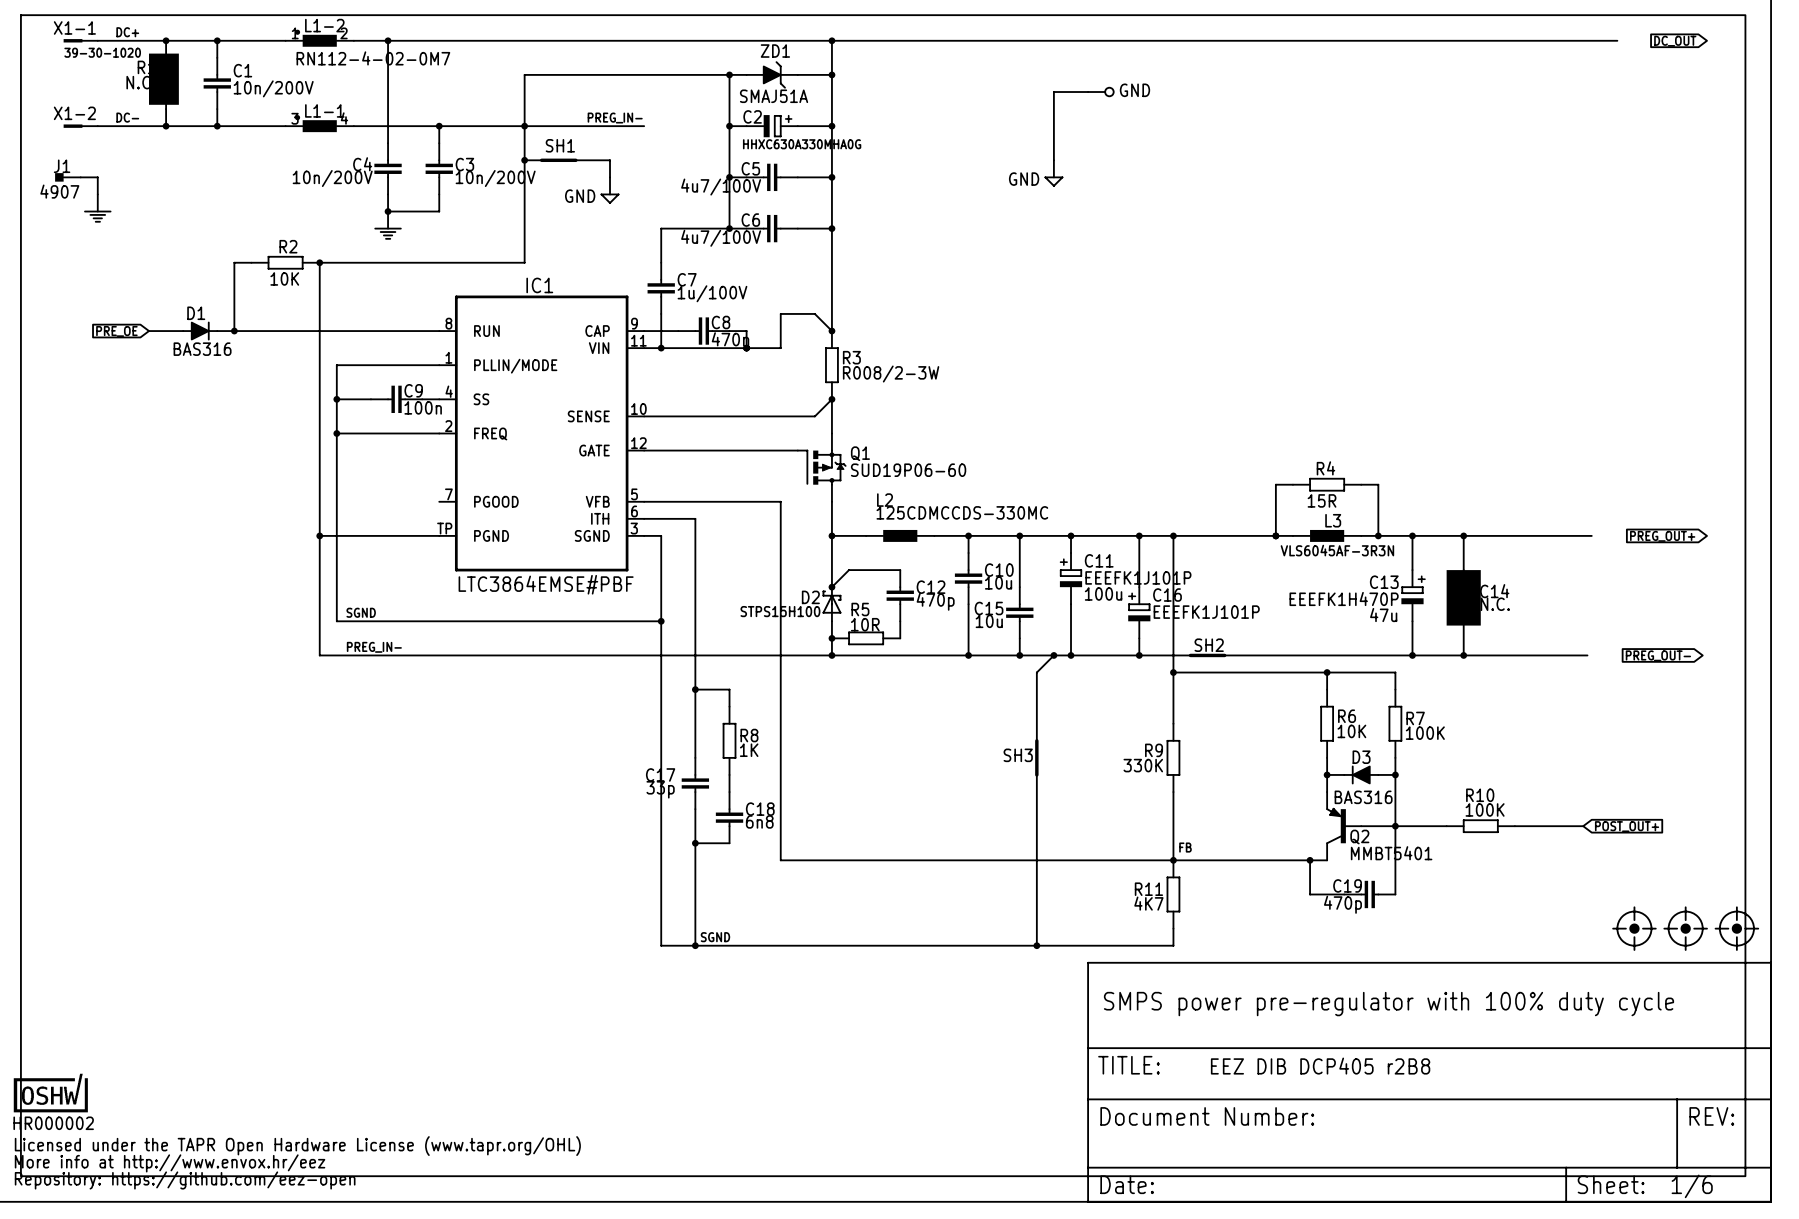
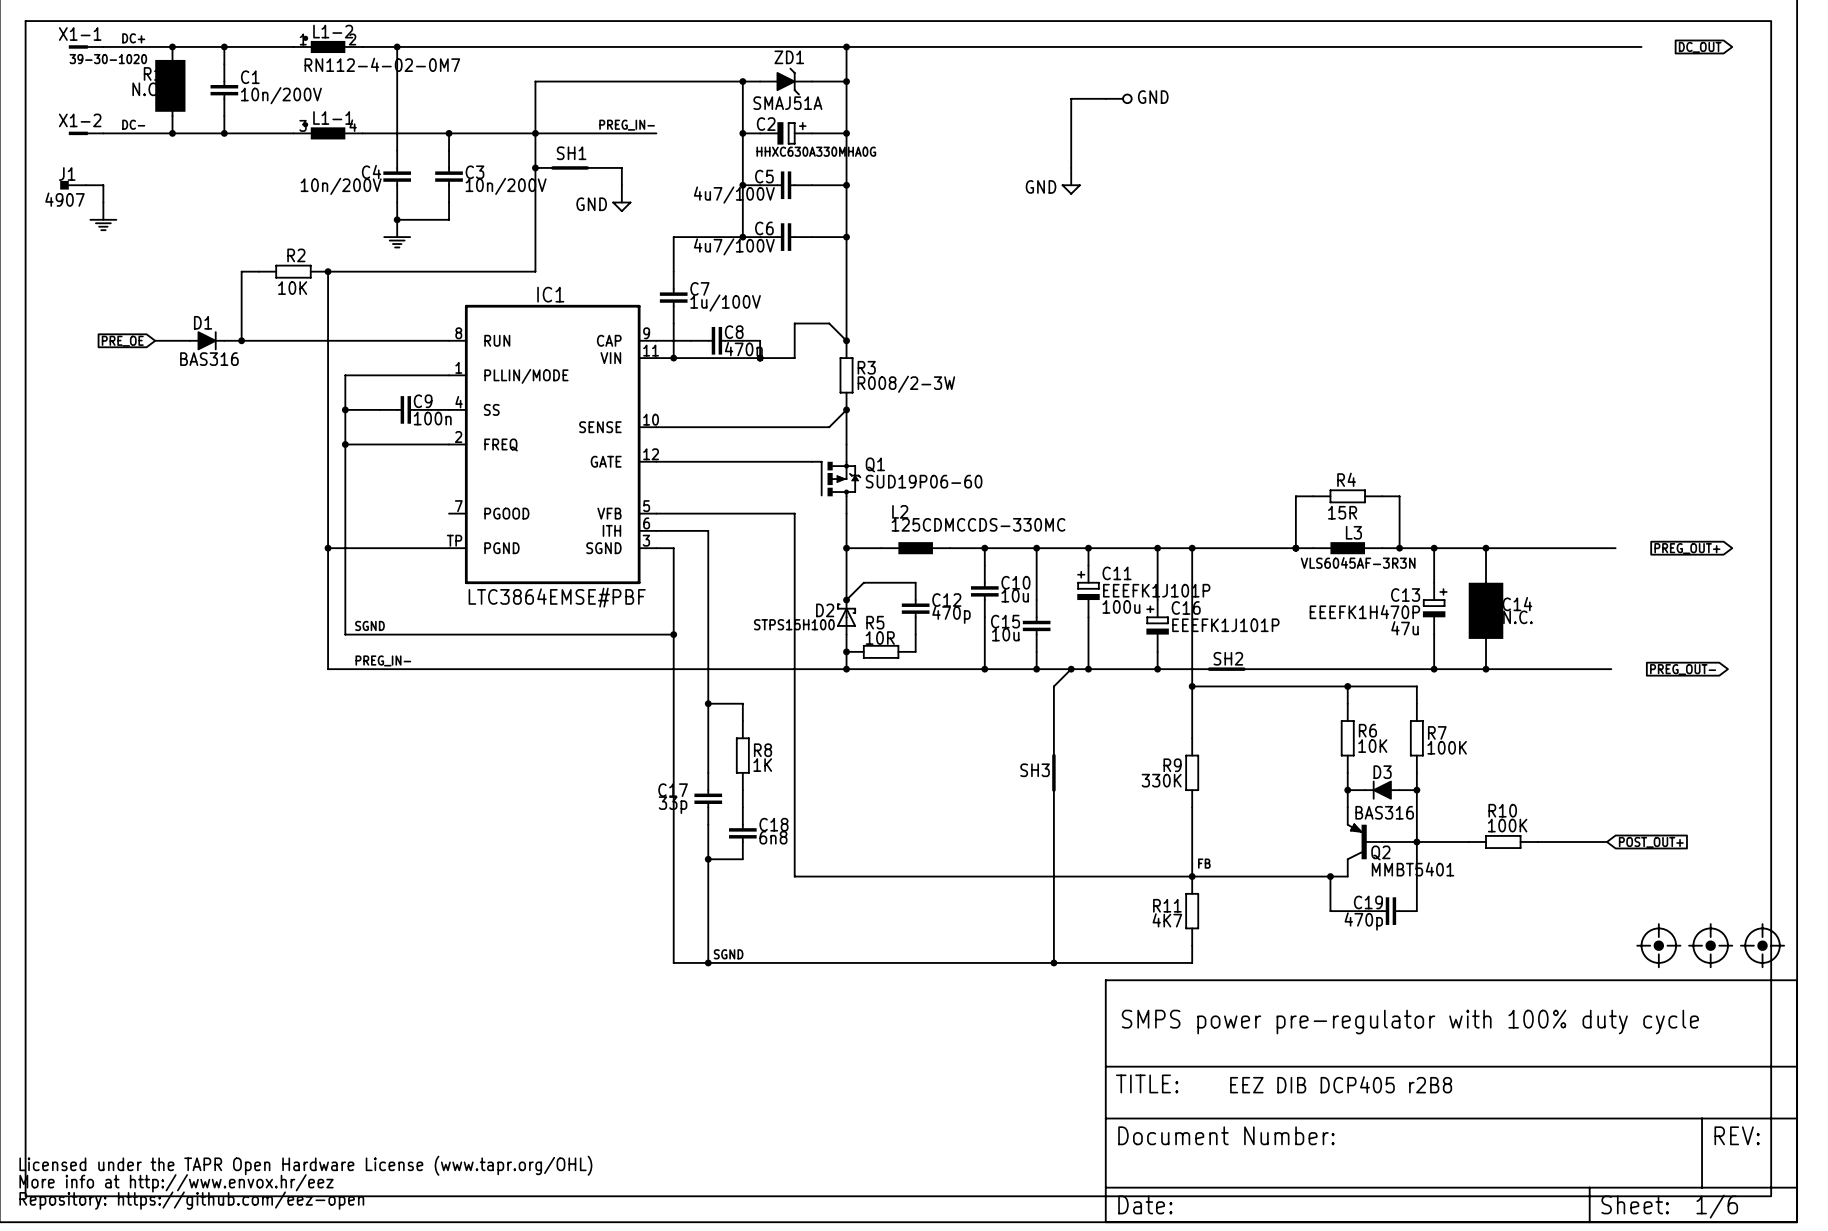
part: HR000002 (50, 1093) -> none

